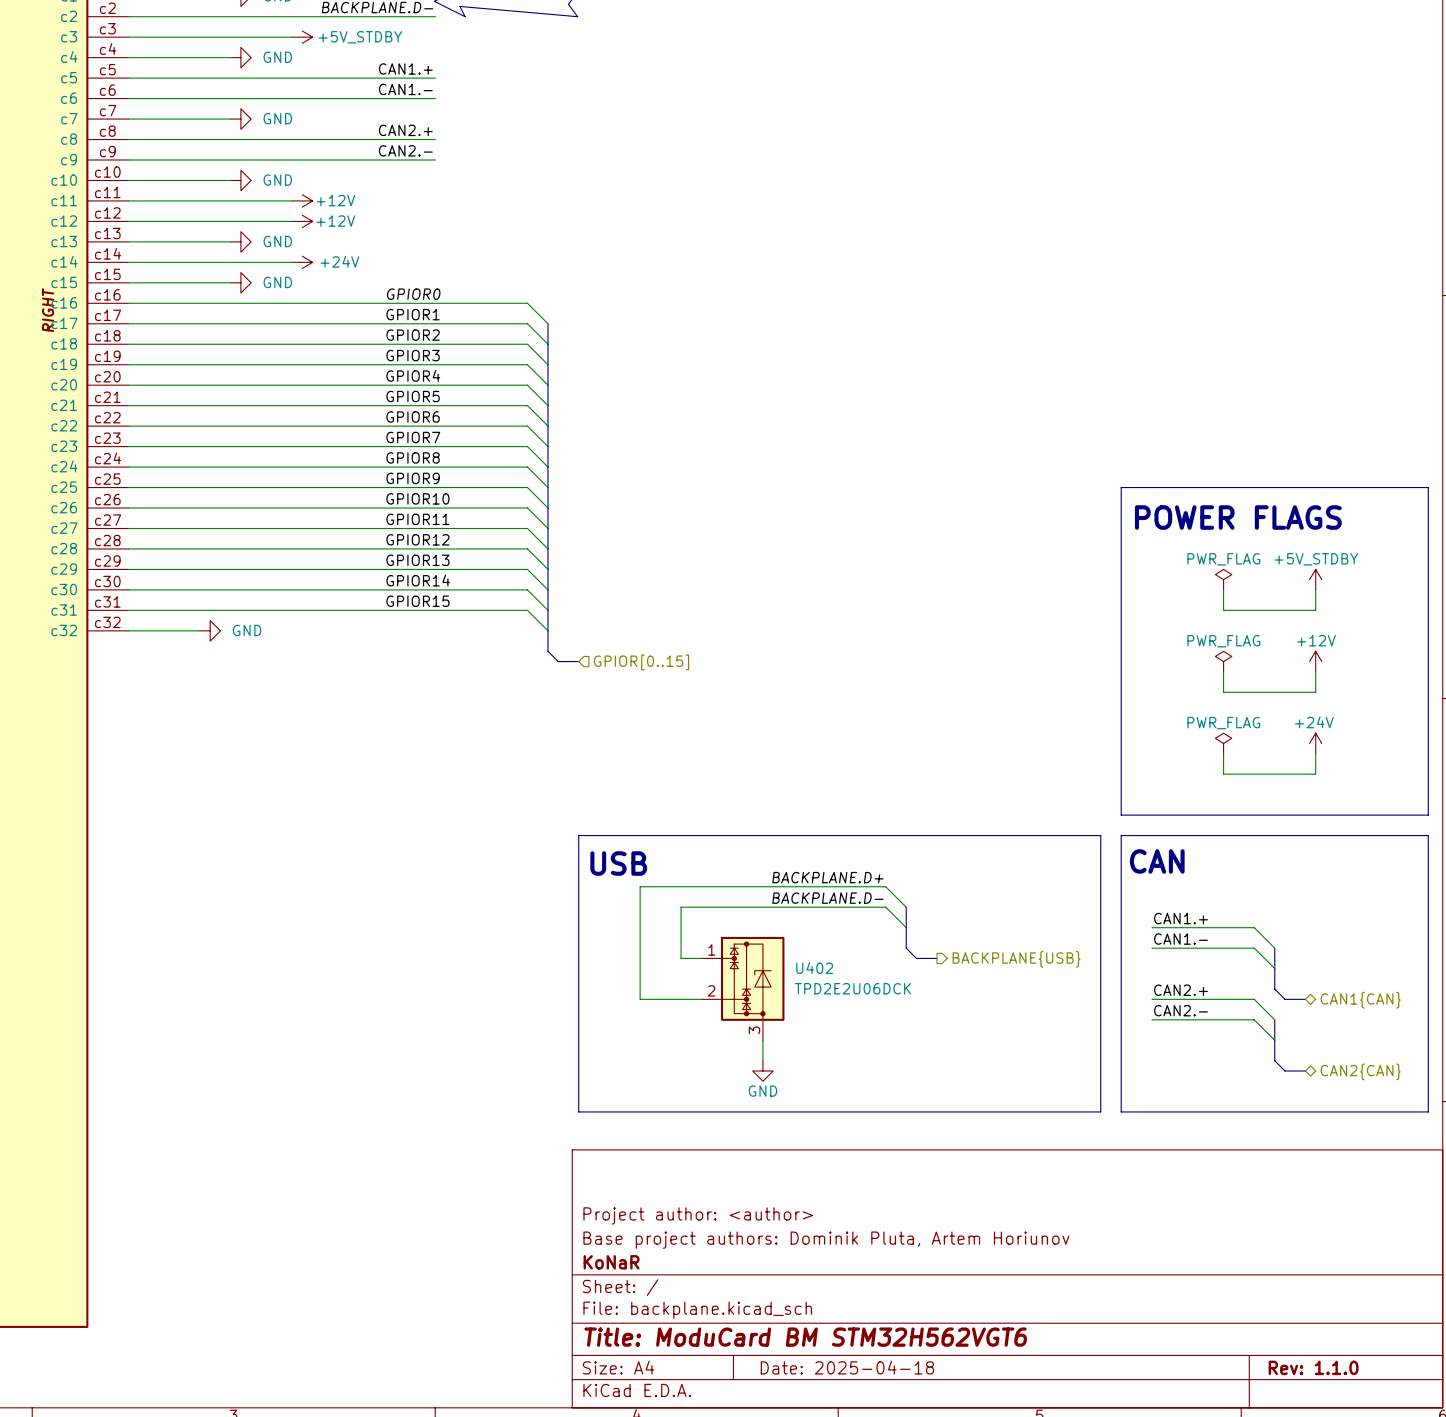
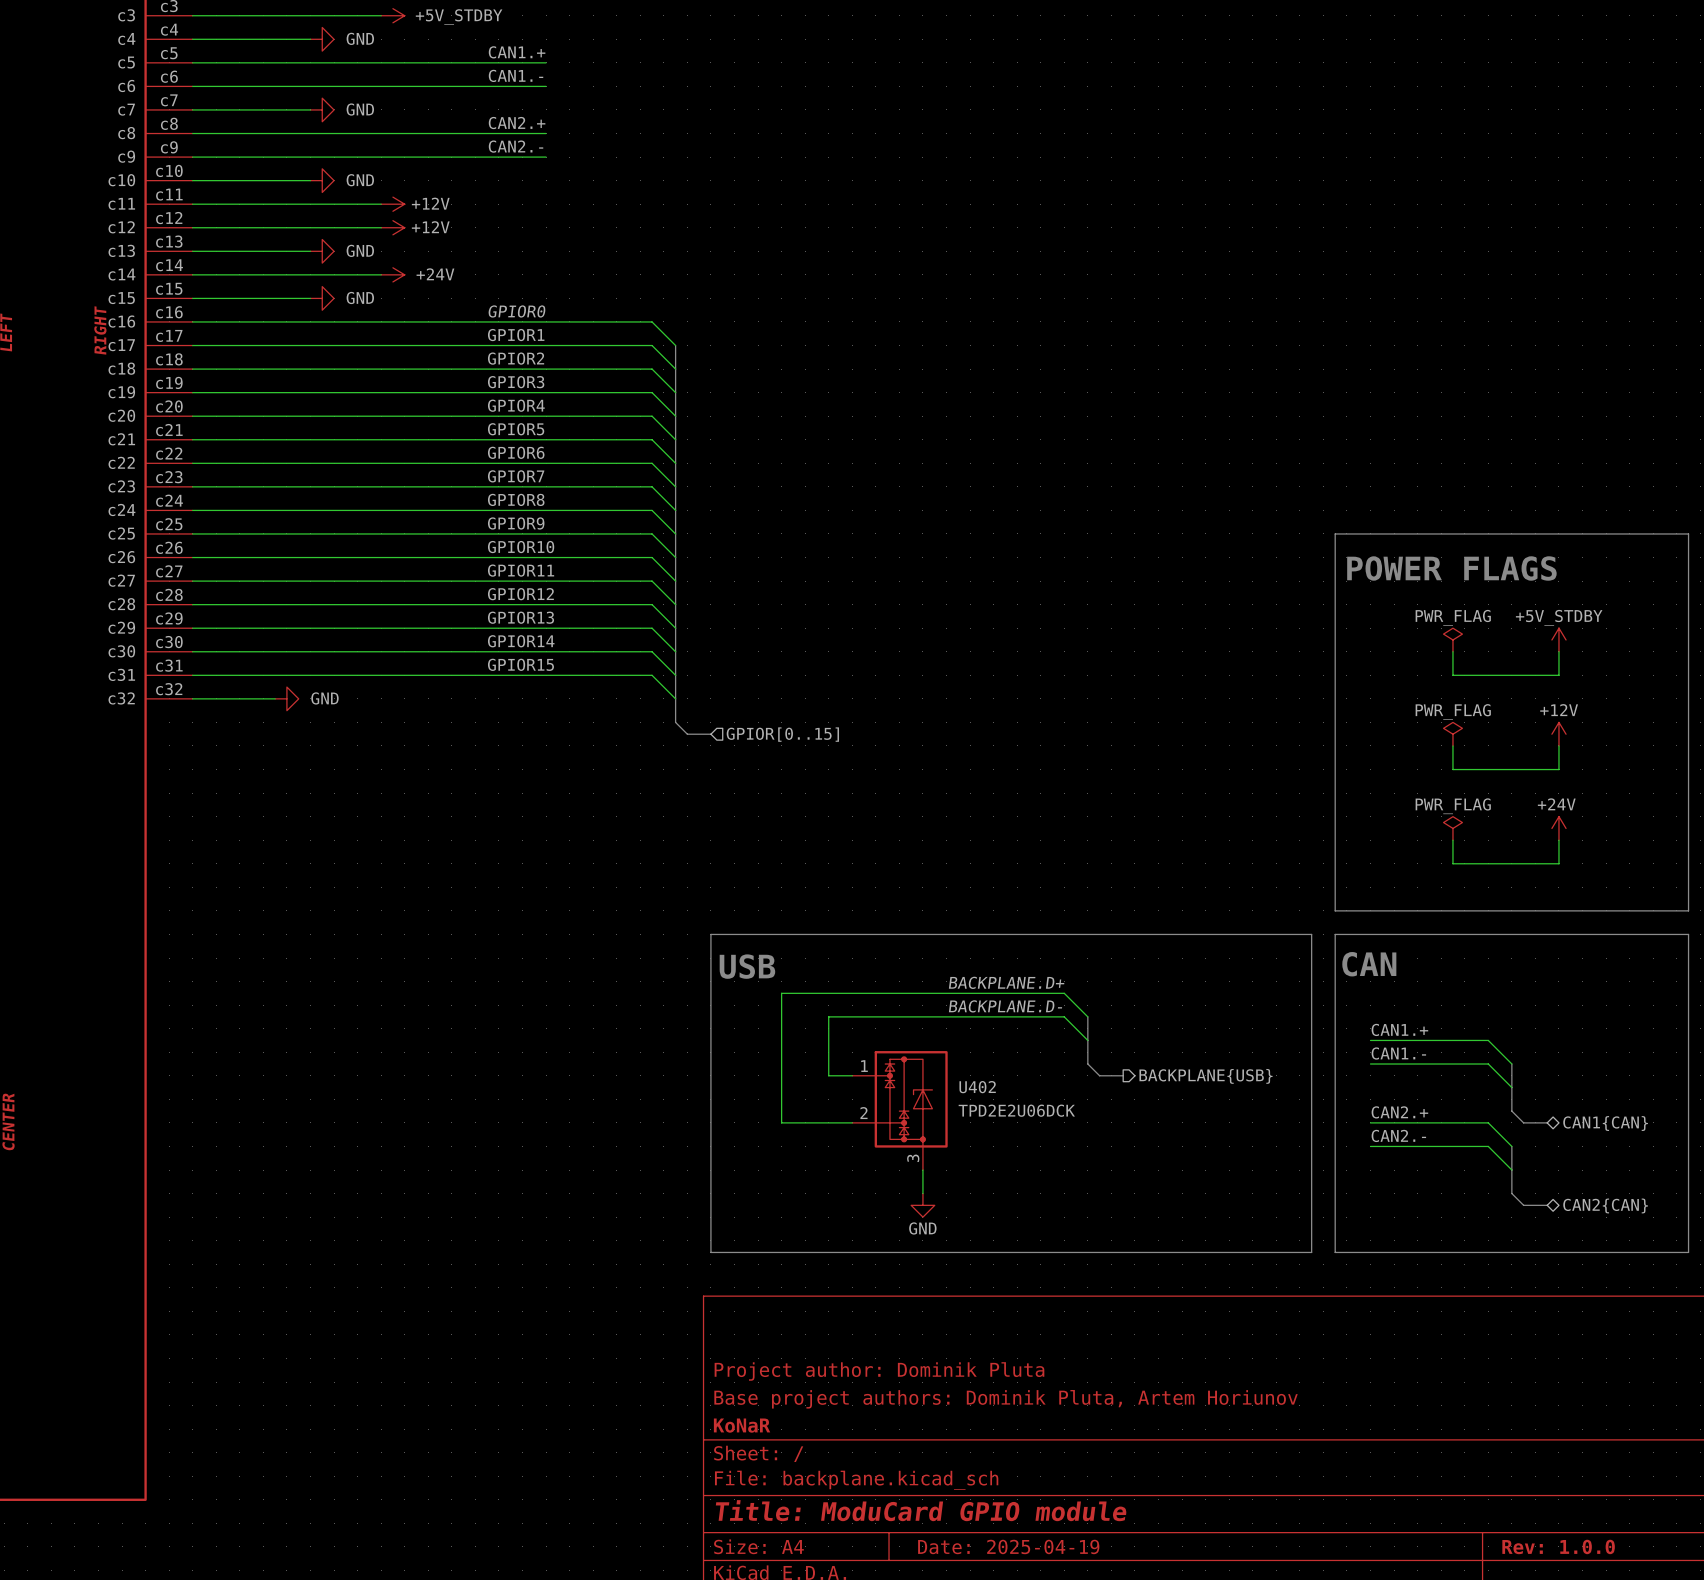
title block: Project author: <author> (698, 1215) -> Project author: Dominik Pluta (879, 1371)
title block: Title: ModuCard BM STM32H562VGT6 (805, 1337) -> Title: ModuCard GPIO module (921, 1510)
title block: Date: 2025-04-18 (847, 1367) -> Date: 2025-04-19 (1008, 1546)
title block: Rev: 1.1.0 (1313, 1367) -> Rev: 1.0.0 (1558, 1546)

